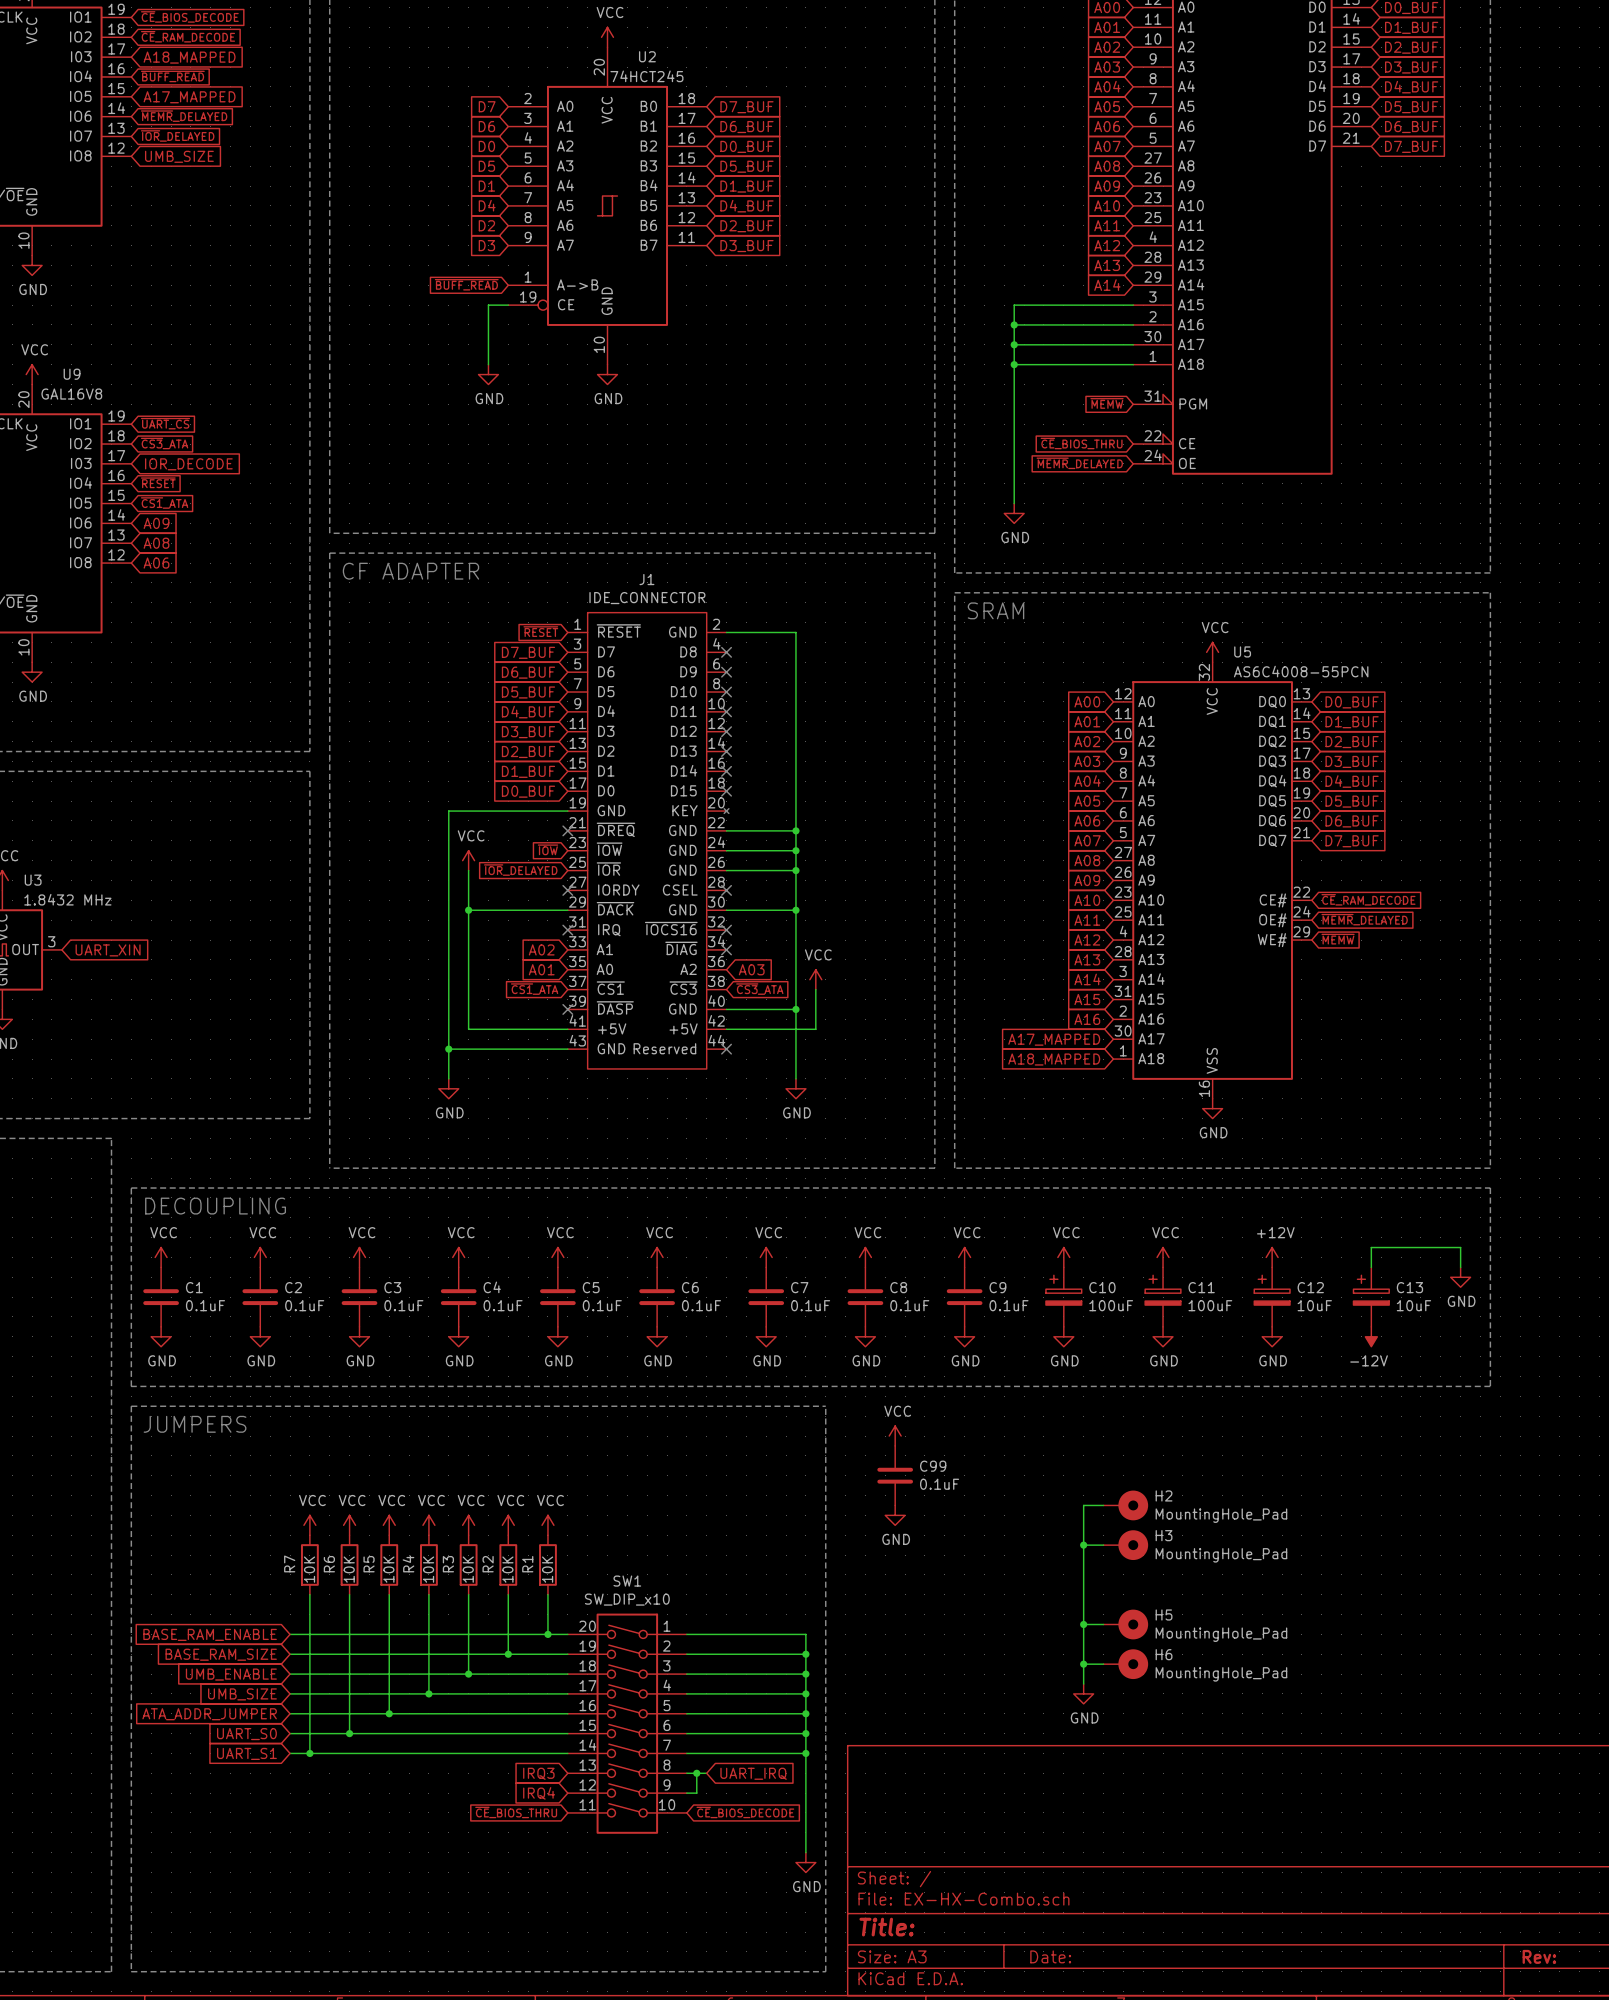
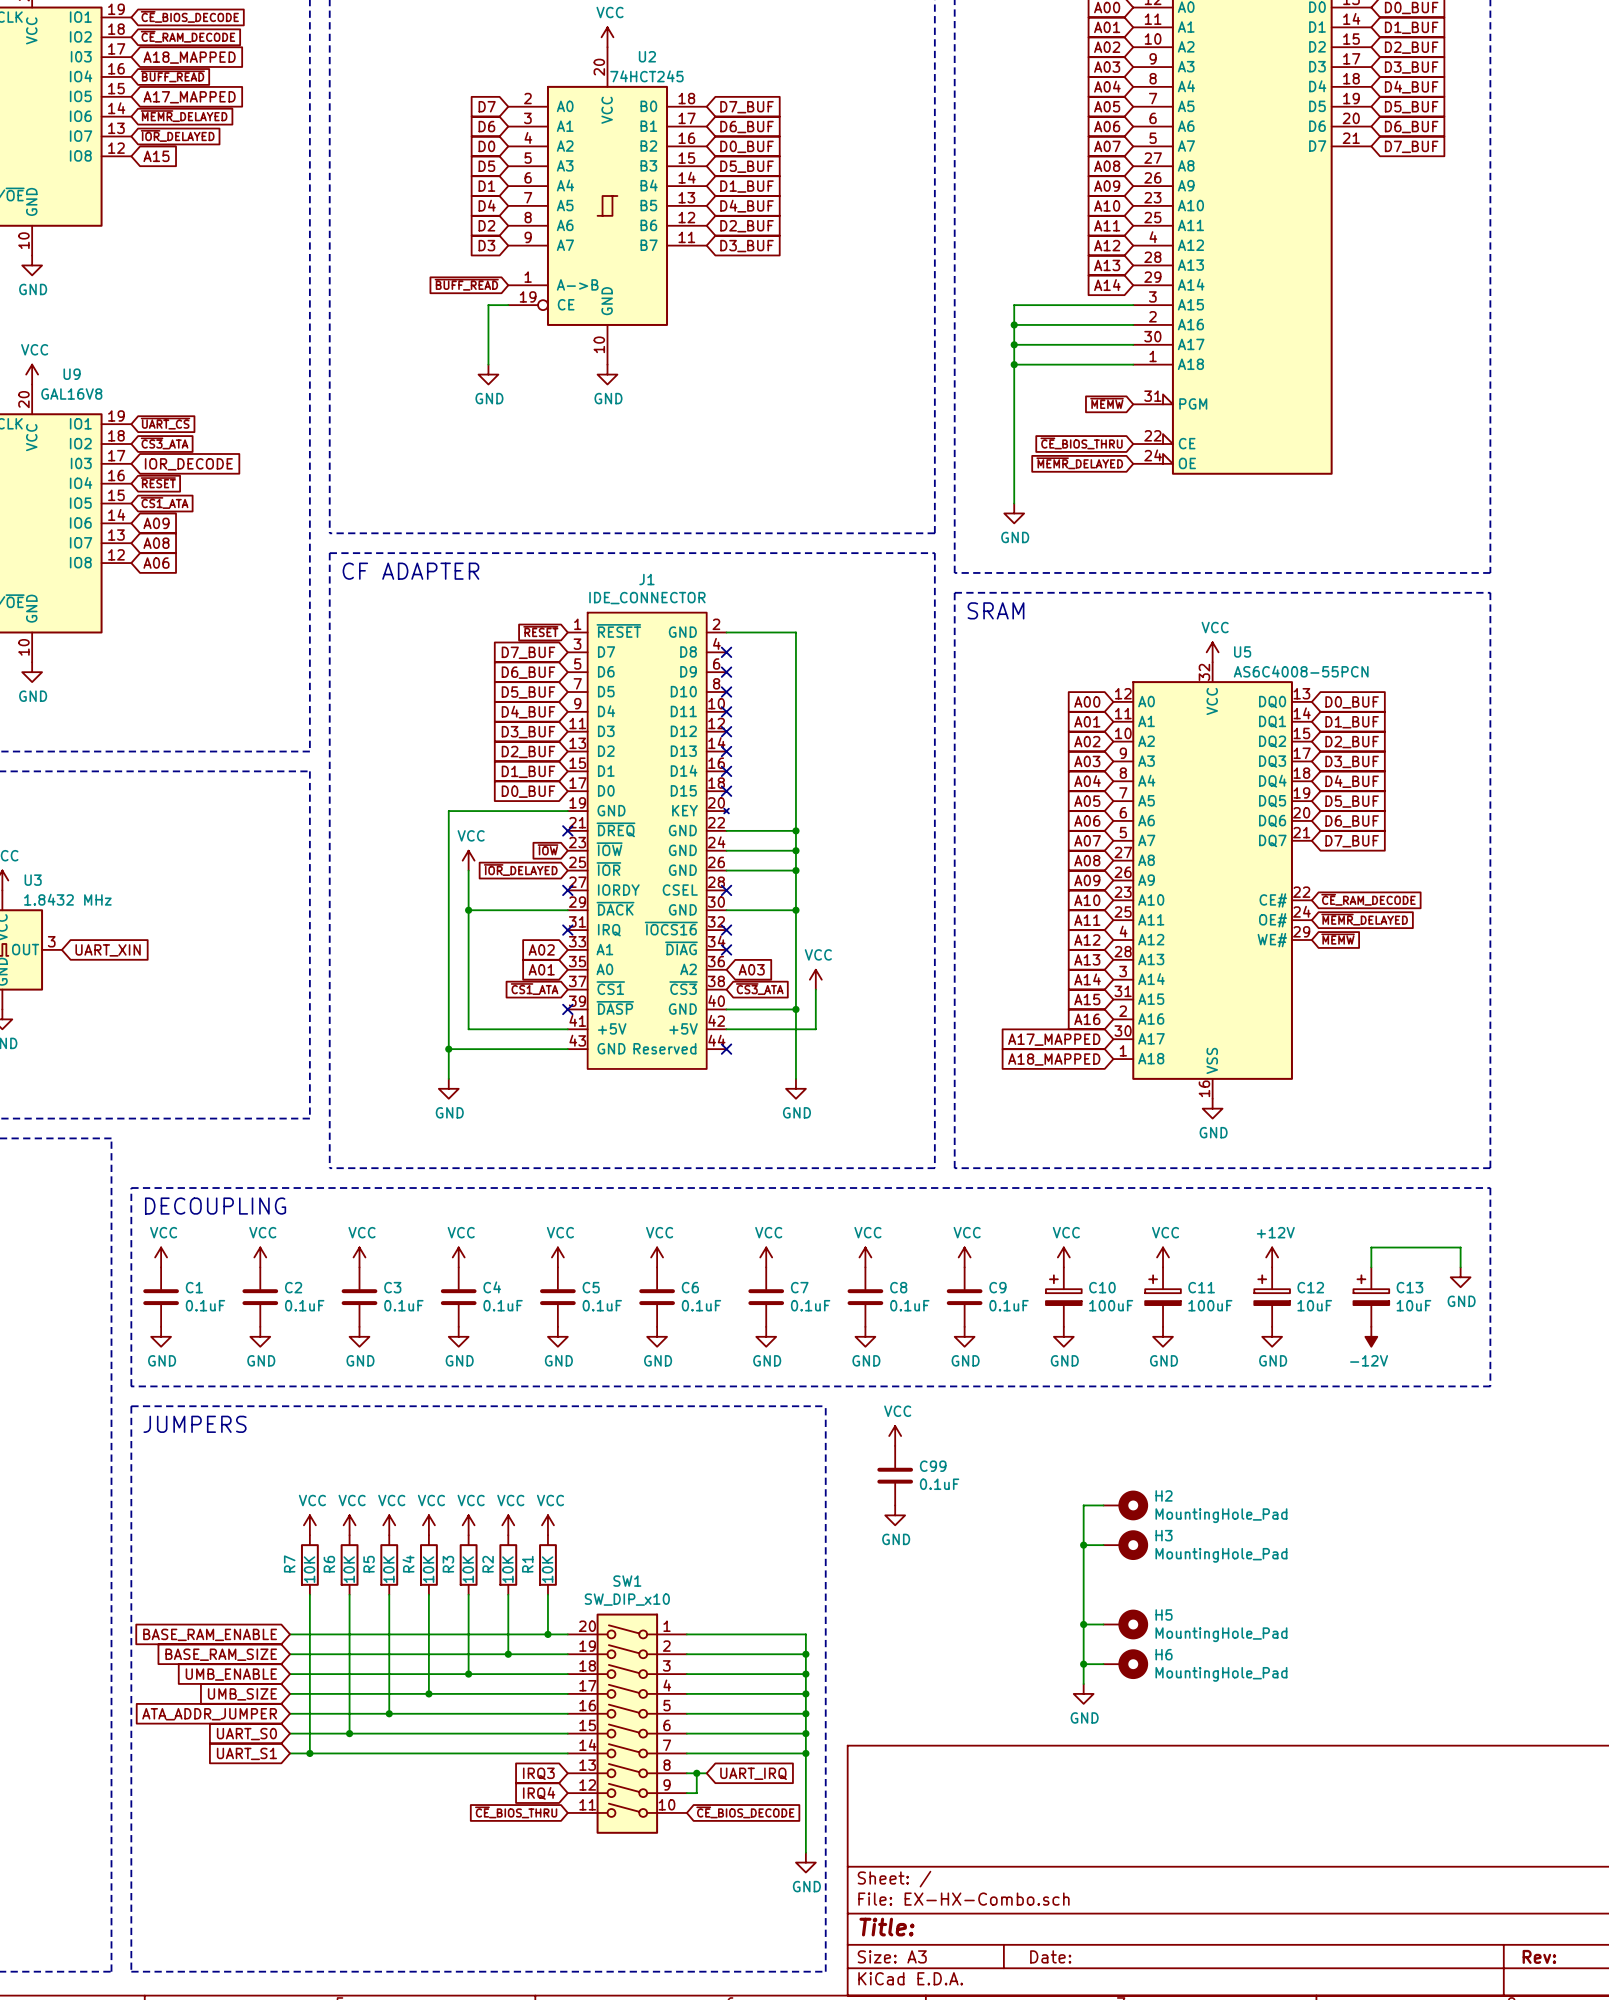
global label: UMB_SIZE (179, 156) -> A15 (156, 156)

